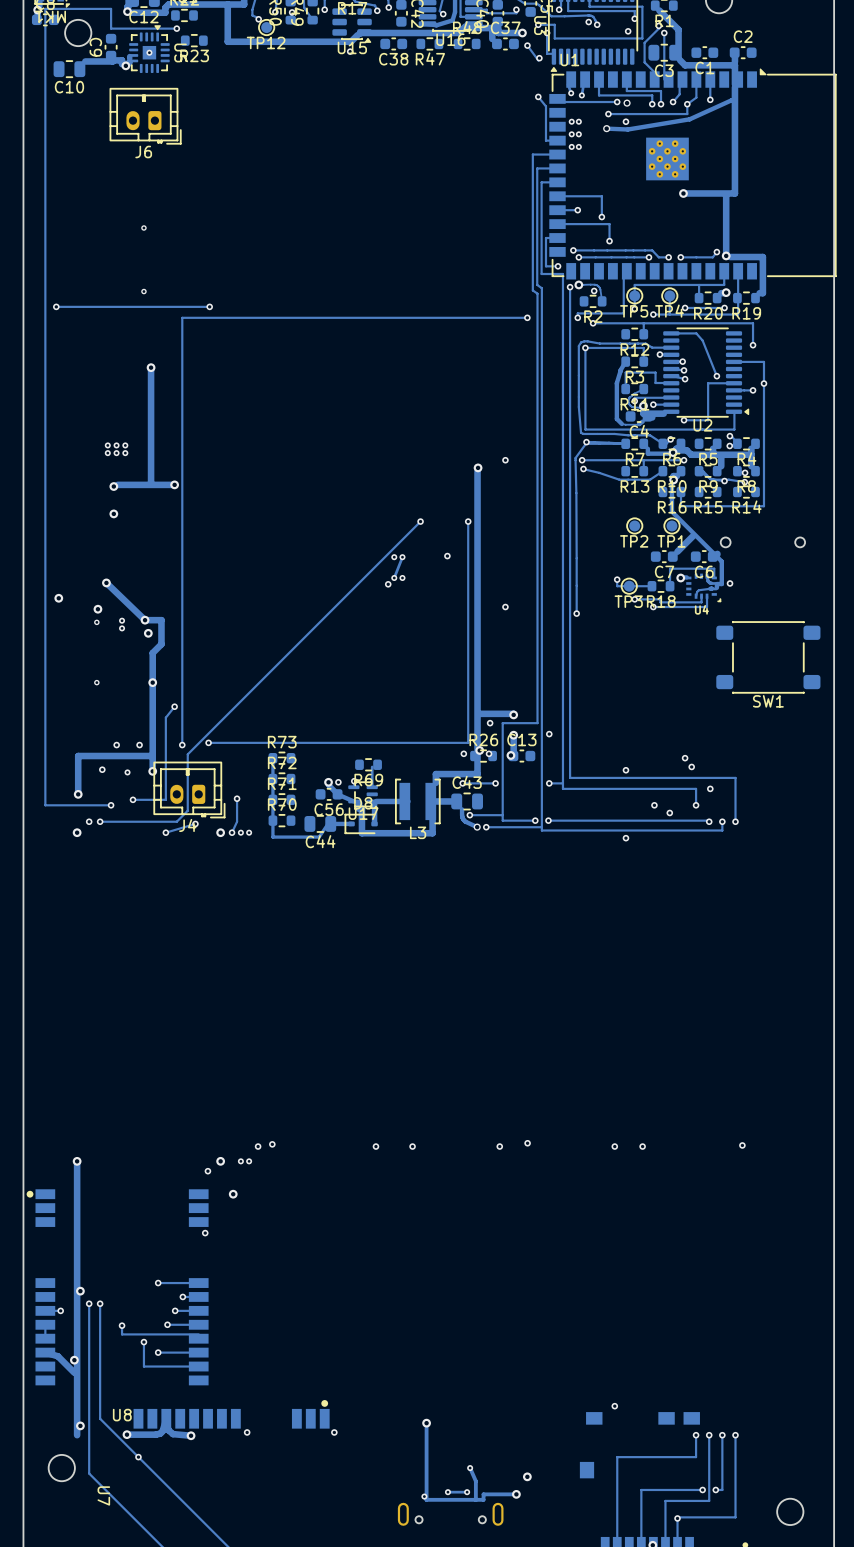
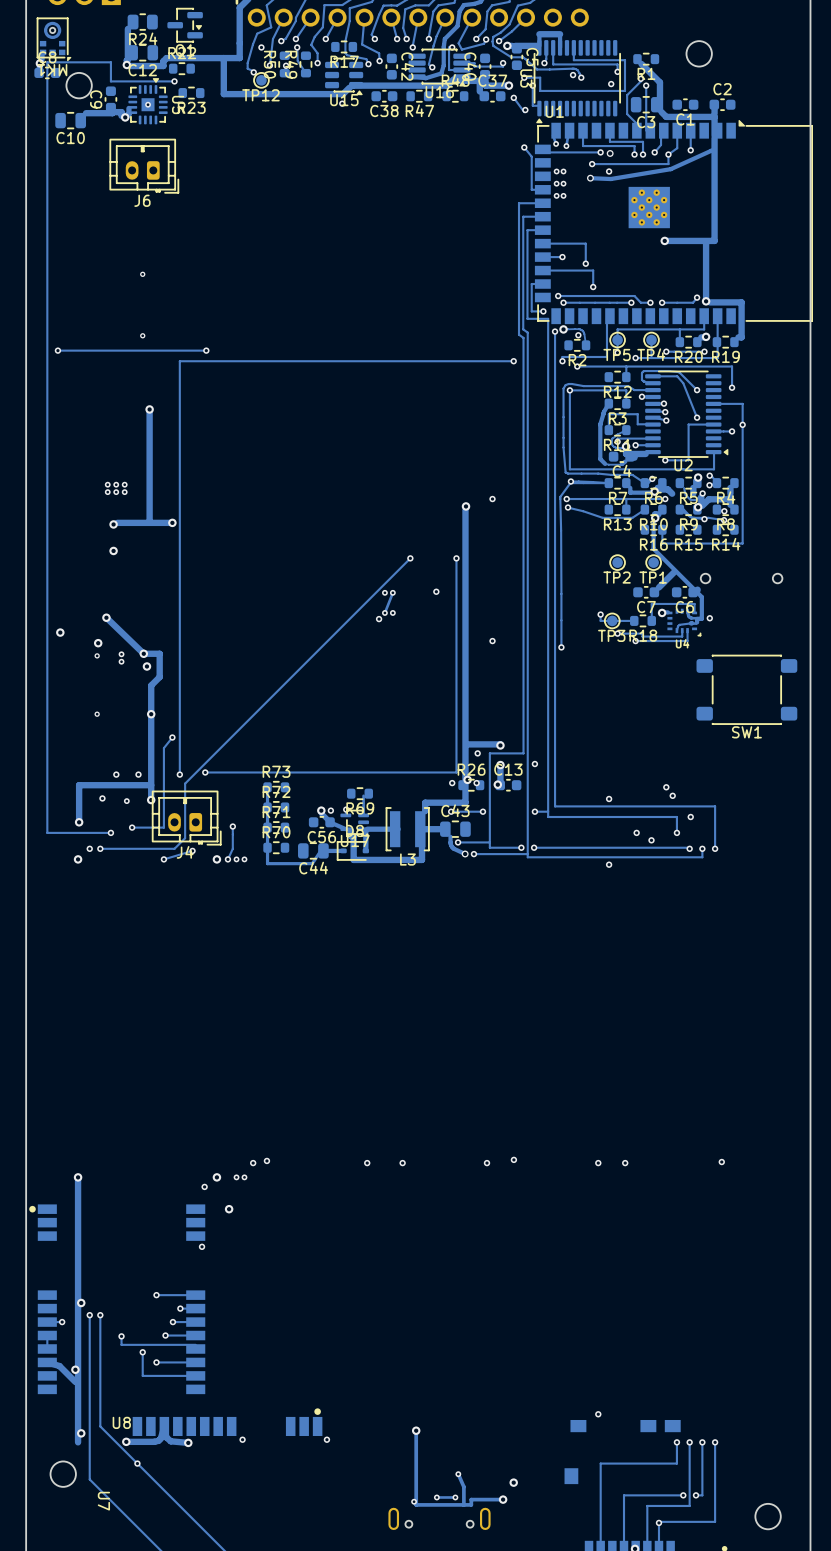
track: none -> (645, 381) (641, 379) (643, 371) (678, 372) (697, 390)
via: none -> (697, 390)
via: none -> (698, 477)
track: none -> (684, 488) (685, 495) (691, 500) (696, 500) (702, 493)
track: (713, 454) (691, 454) -> none
via: none -> (702, 493)
track: (751, 454) (715, 454) -> none
track: none -> (727, 499) (709, 499) (702, 505)
via: none -> (698, 507)

